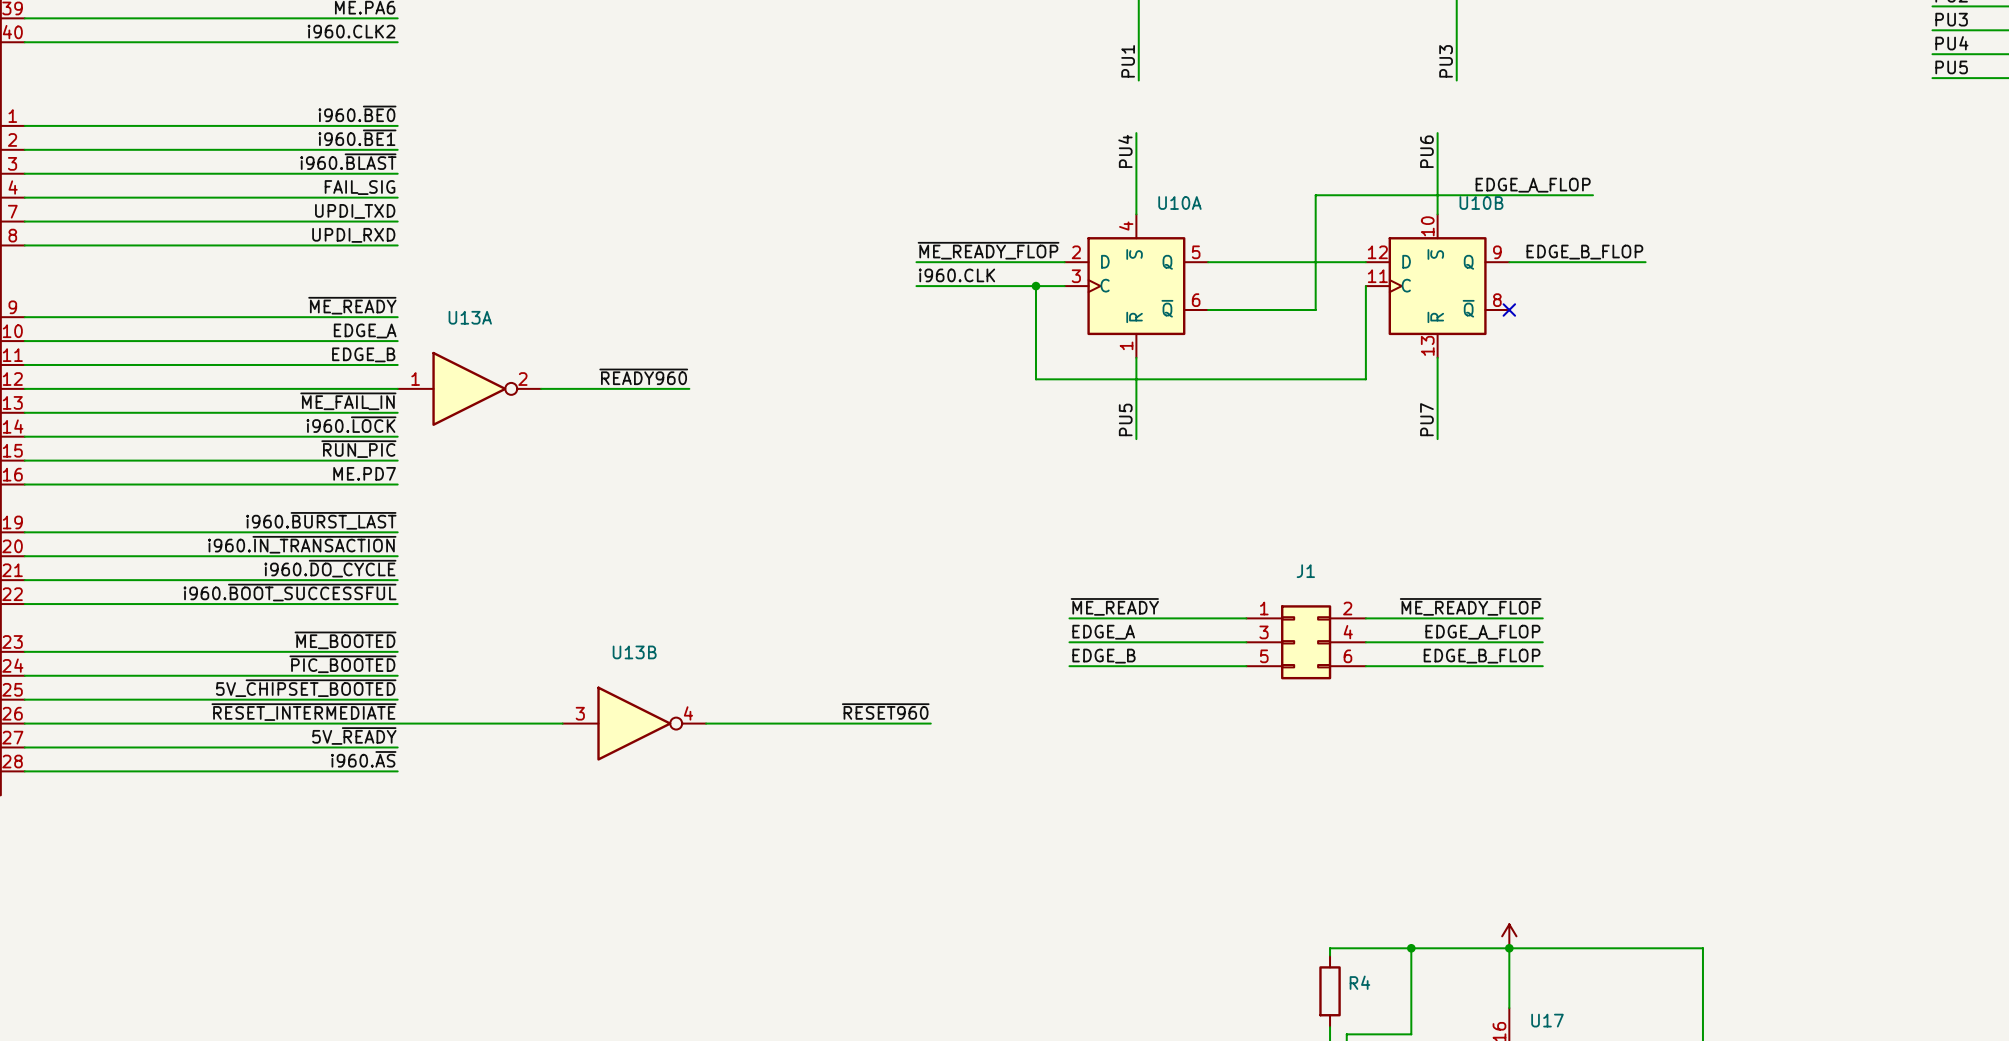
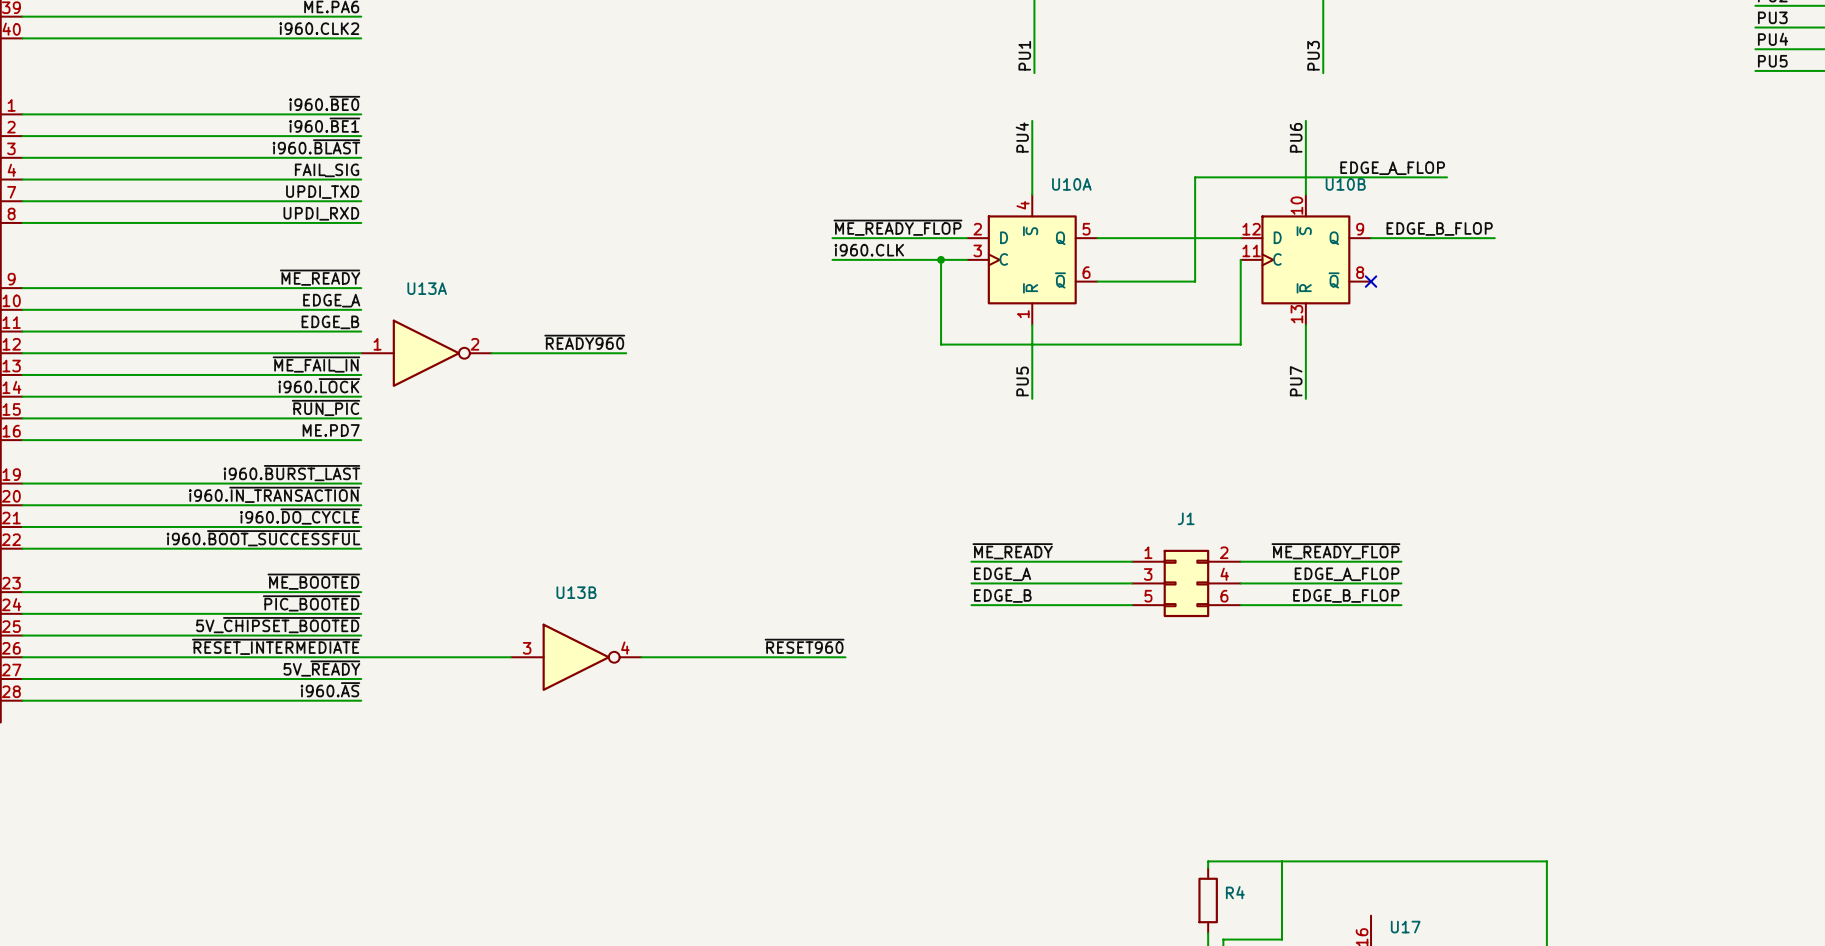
power symbol: (1509, 936) -> none
junction: (1411, 948) -> none
wire: (1509, 948) (1509, 1008) -> none
junction: (1509, 948) -> none

